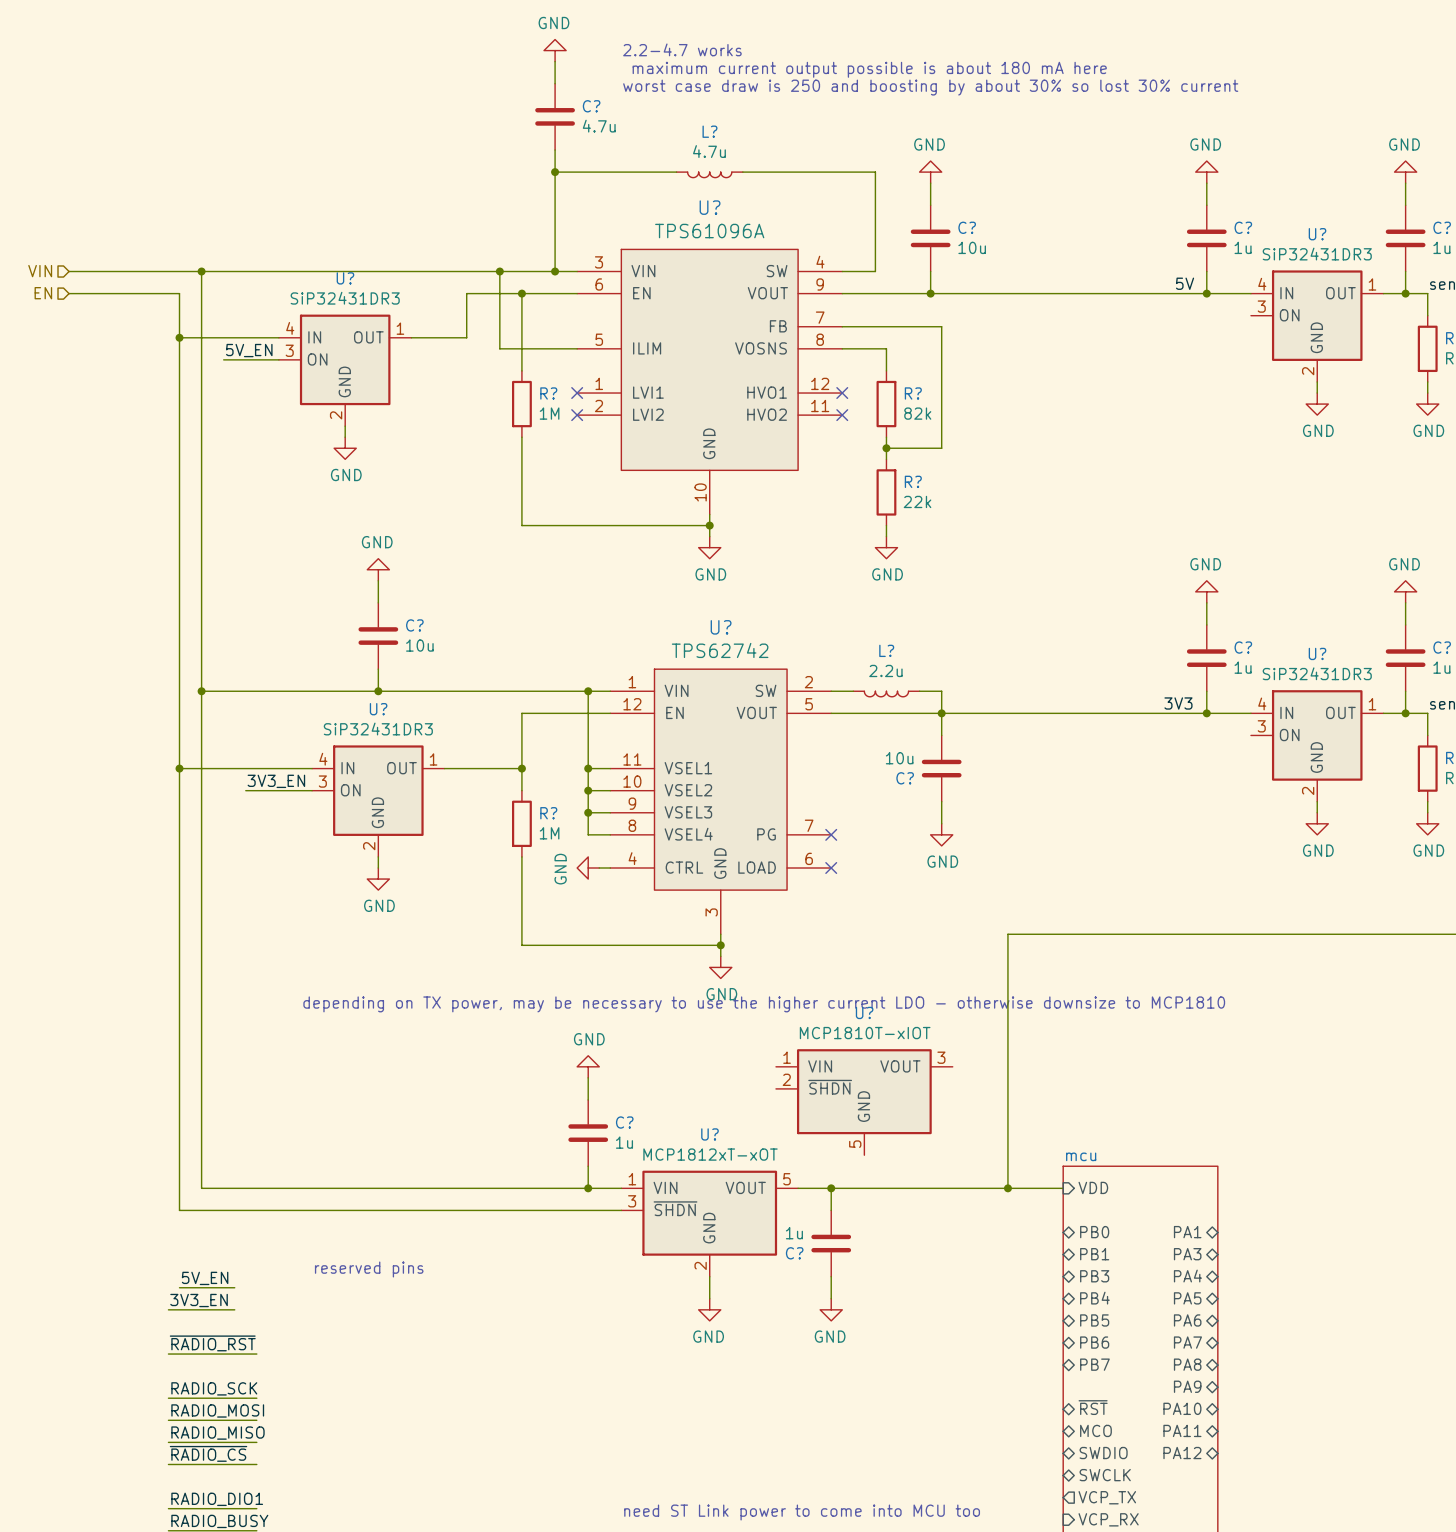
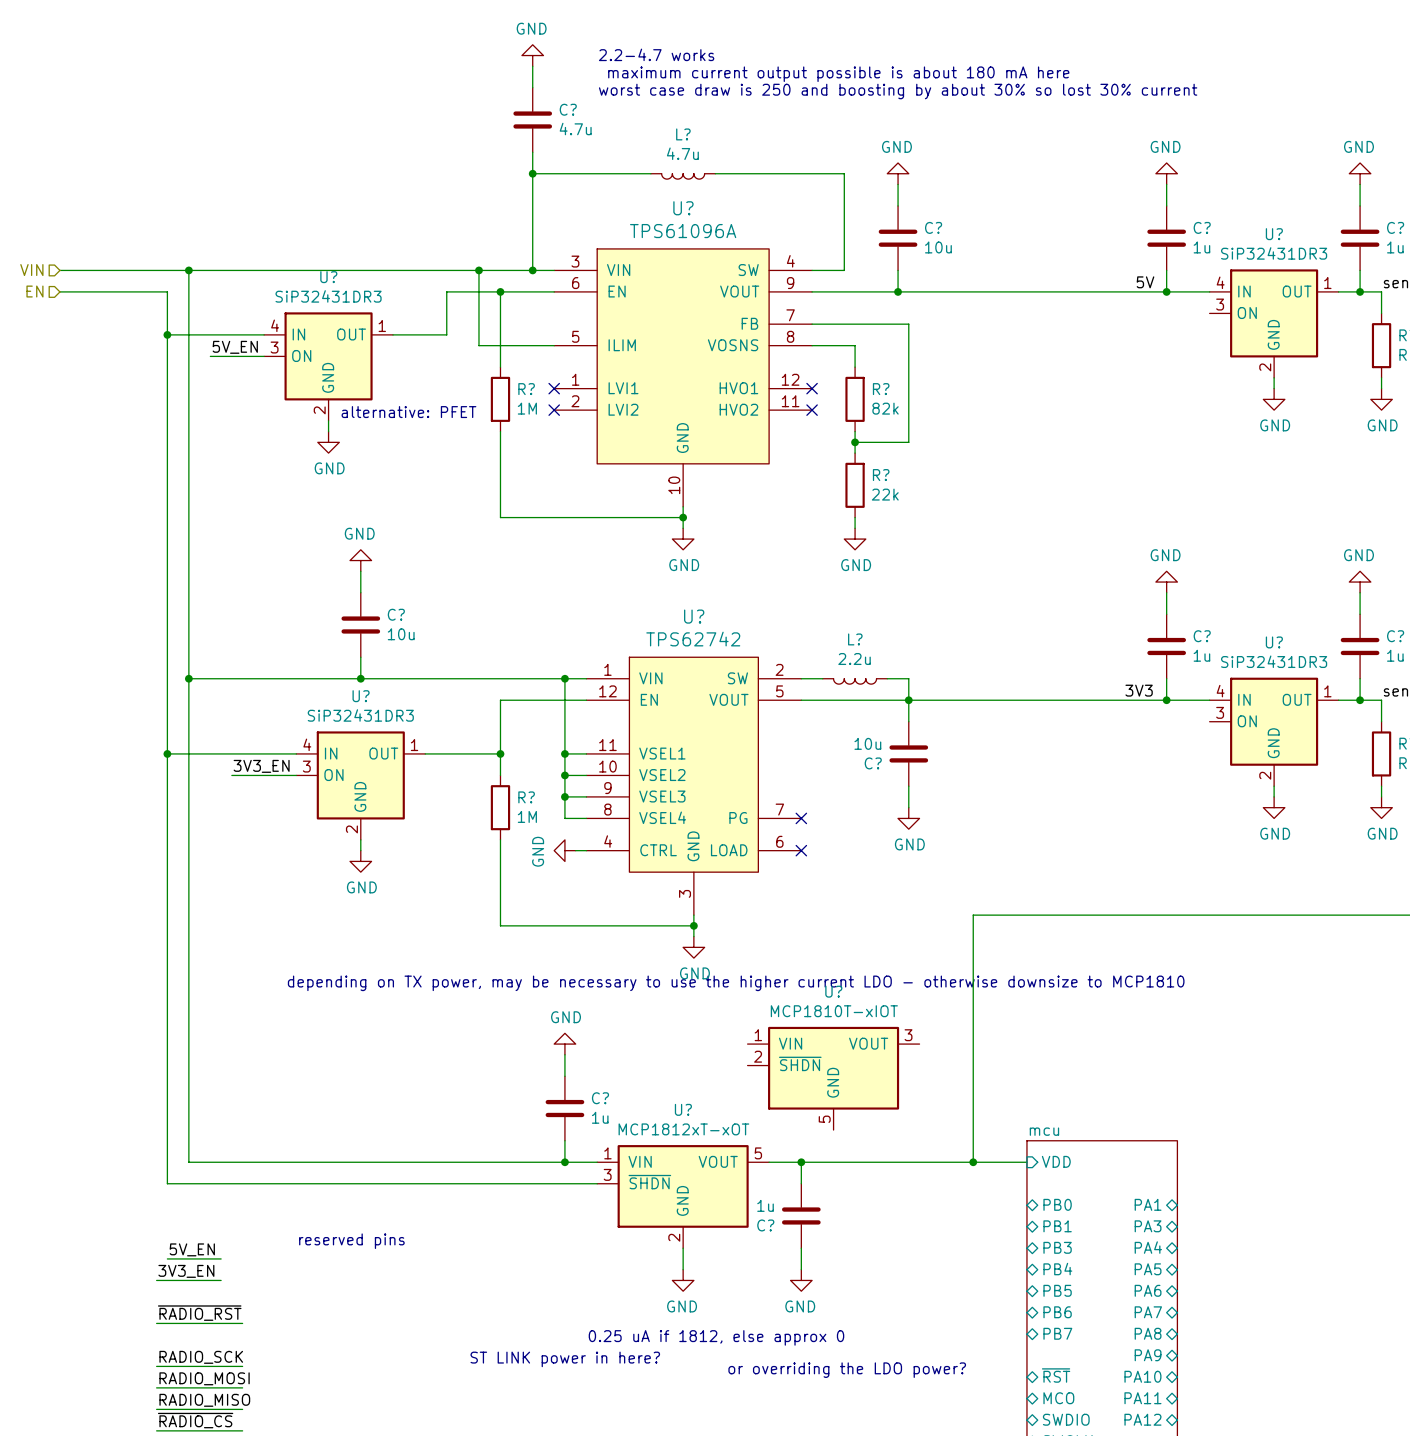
text: none -> alternative: PFET (408, 412)
text: none -> 0.25 uA if 1812, else approx 0 (716, 1337)
text: none -> ST LINK power in here? (565, 1359)
text: none -> or overriding the LDO power? (847, 1370)

